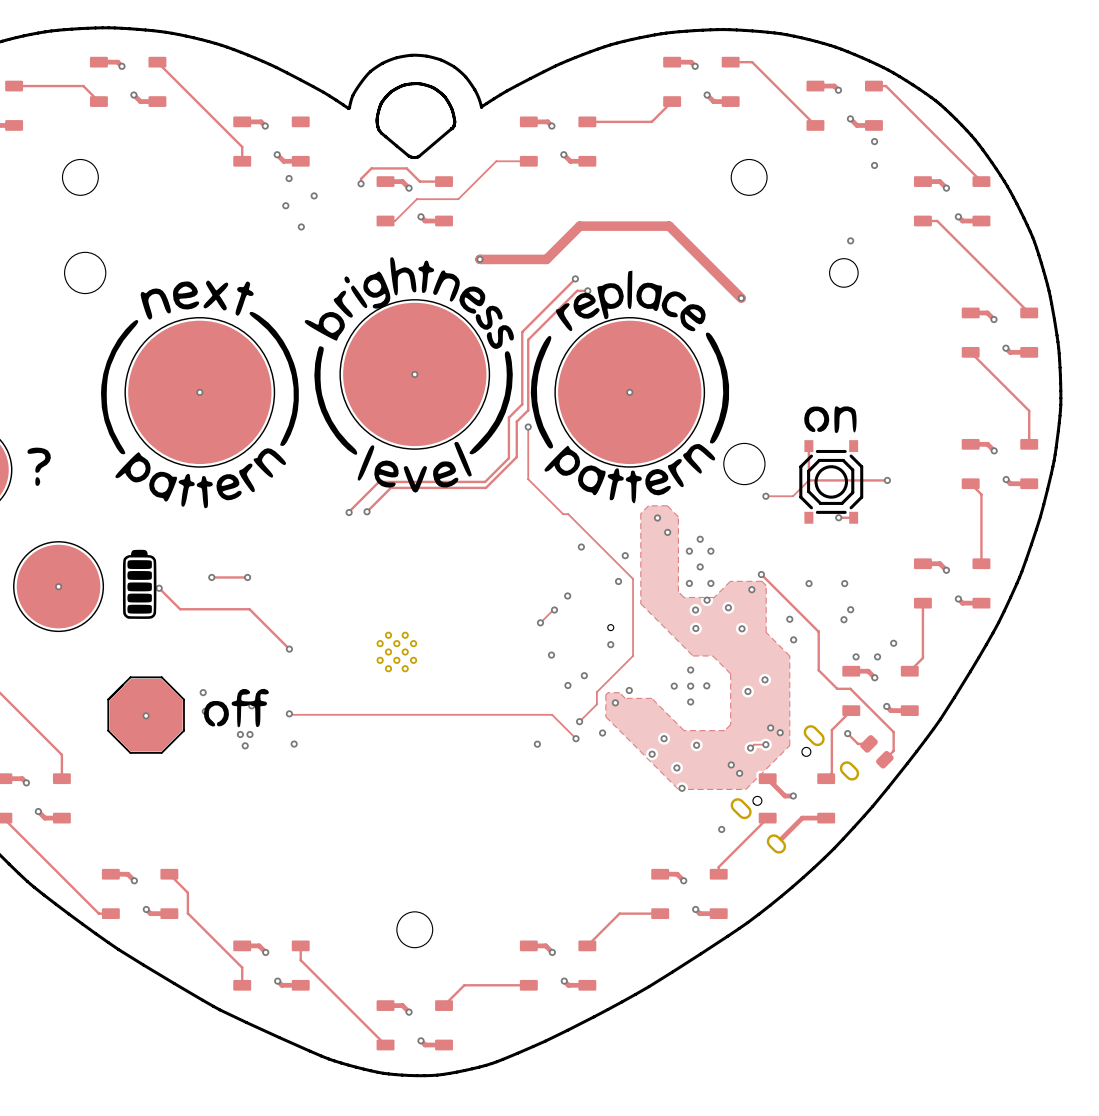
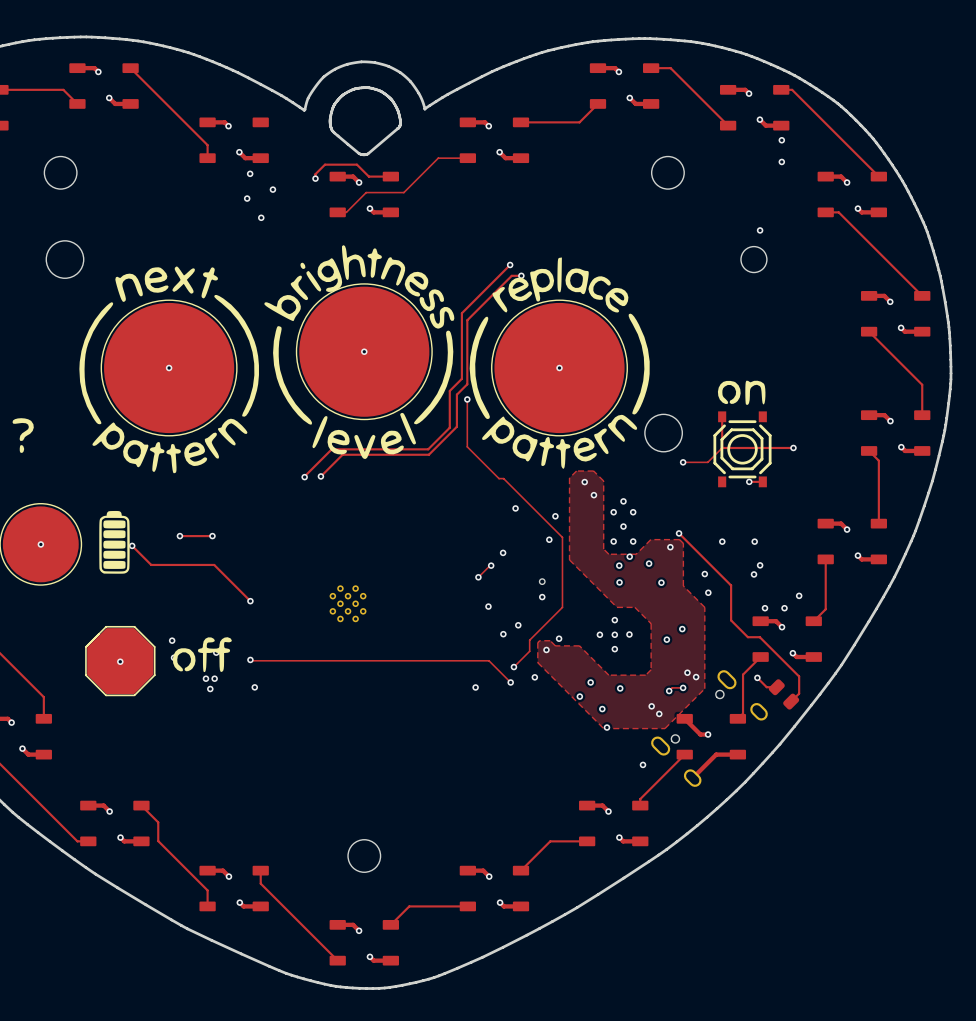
via: (479, 259) -> none
track: (480, 259) (546, 259) (579, 226) (669, 226) (741, 298) -> none
via: (741, 298) -> none

